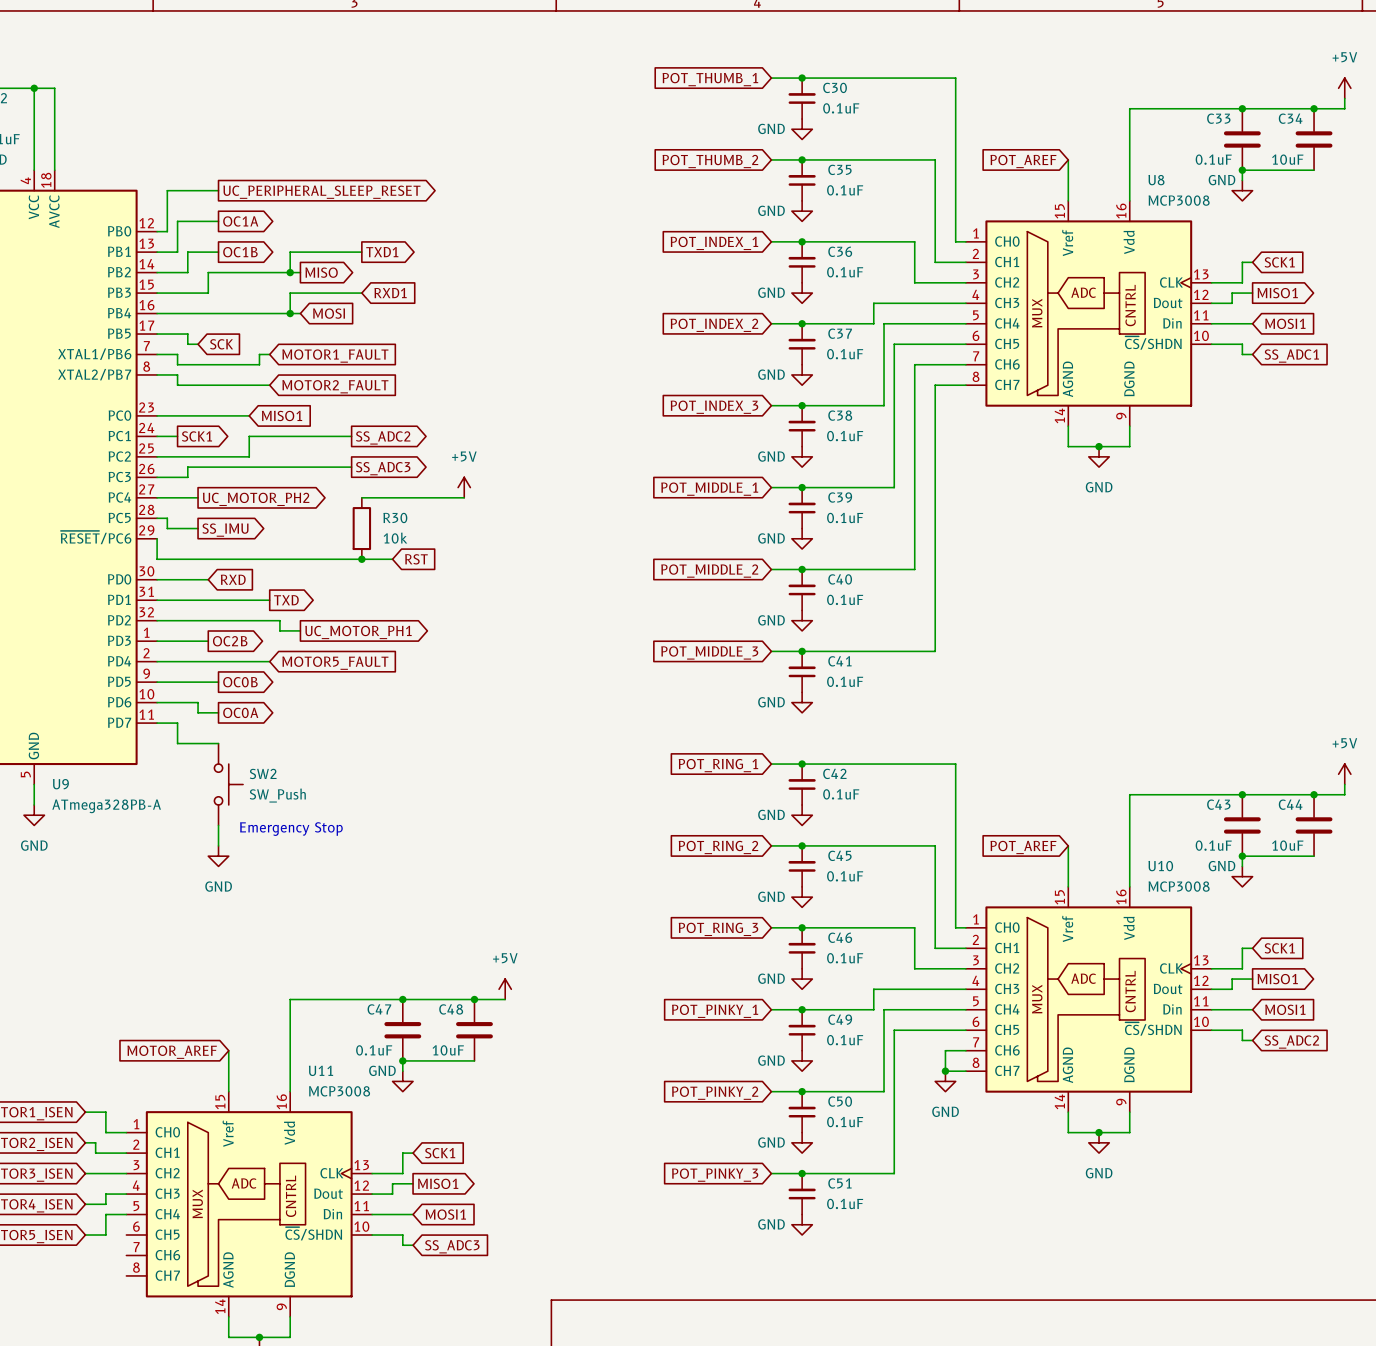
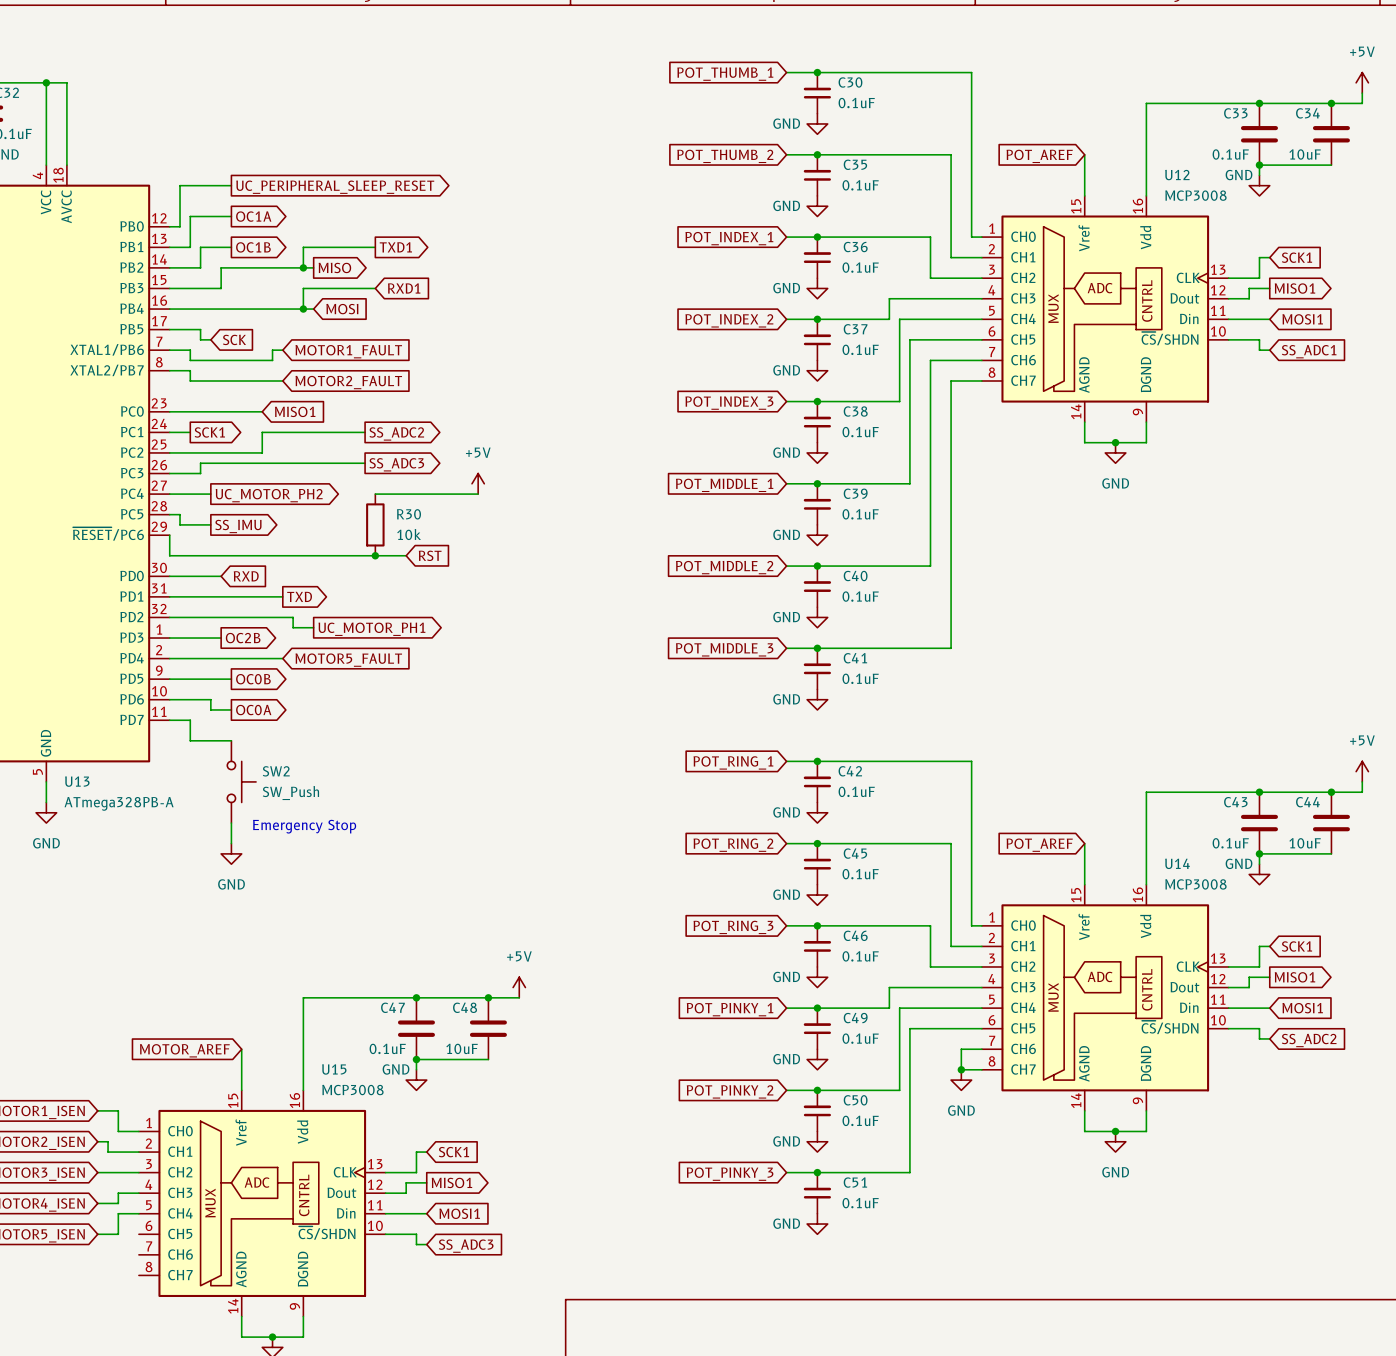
U8 name: U8 (1156, 180) -> U12 (1177, 175)
U9 name: U9 (60, 784) -> U13 (77, 781)
U10 name: U10 (1160, 866) -> U14 (1177, 863)
U11 name: U11 (321, 1070) -> U15 (334, 1069)

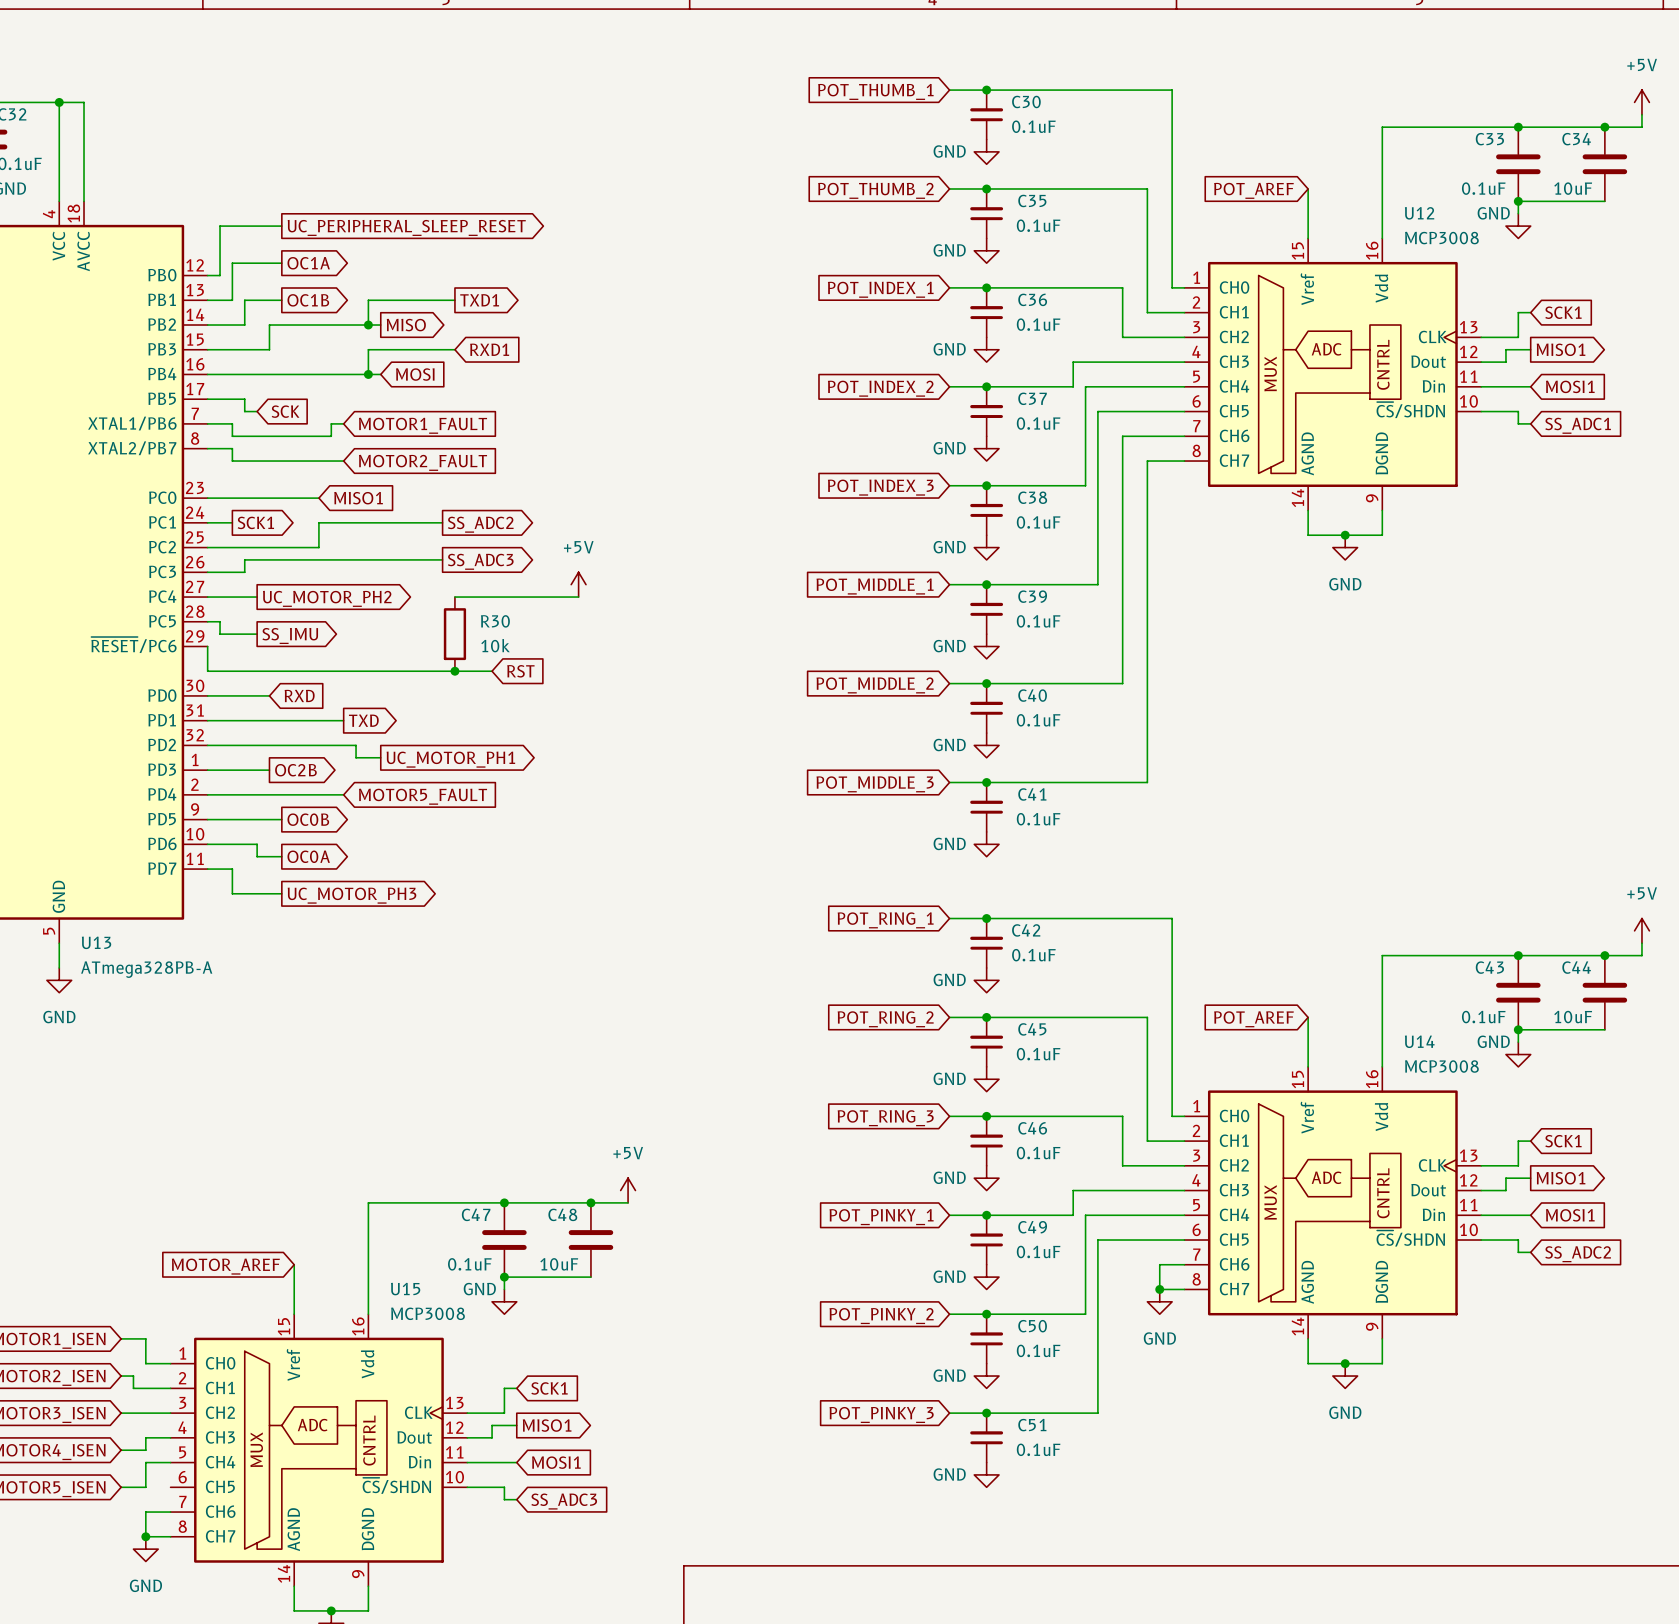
global label: none -> UC_MOTOR_PH3 (352, 895)
SW2: SW_Push (241, 781) -> none
wire: (231, 823) (231, 843) -> none
text: Emergency Stop (304, 826) -> none
power symbol: GND (231, 853) -> none
wire: none -> (170, 1512) (145, 1512) (145, 1536) (170, 1536)
junction: none -> (145, 1536)
power symbol: none -> GND (145, 1549)

